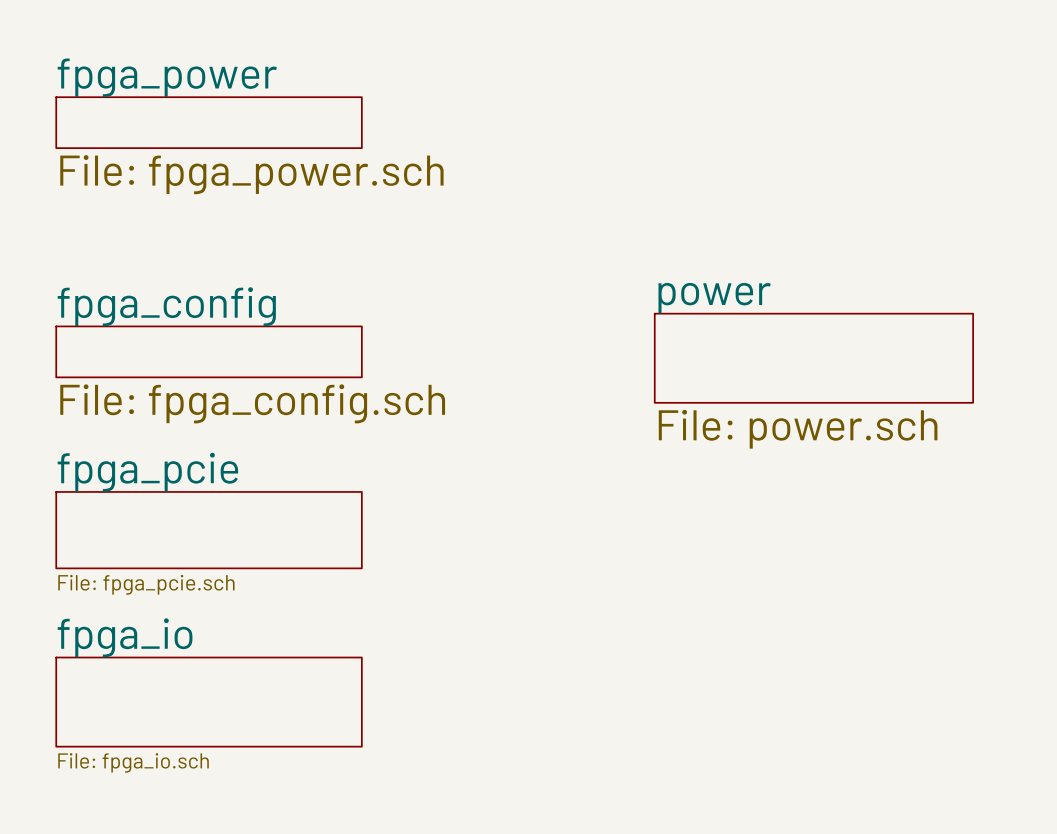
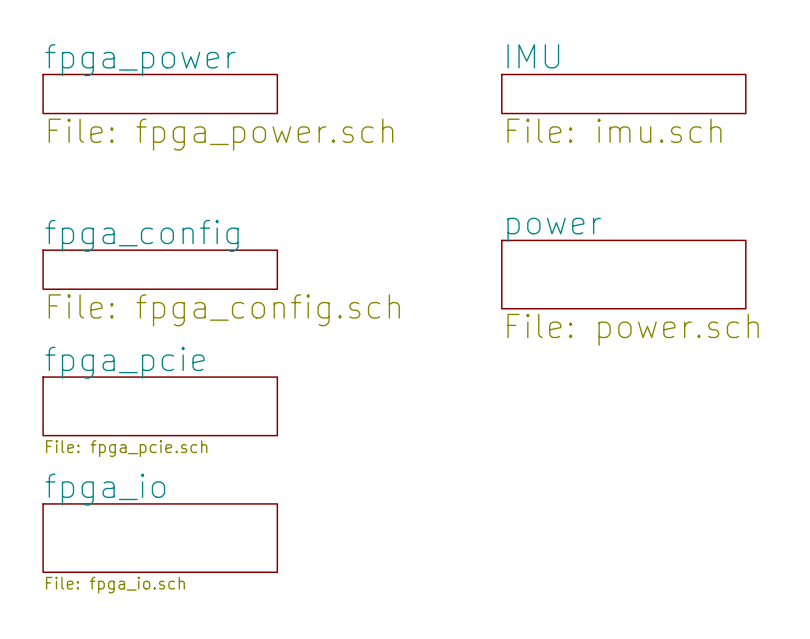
sheet IMU: none -> File: imu.sch (623, 94)

